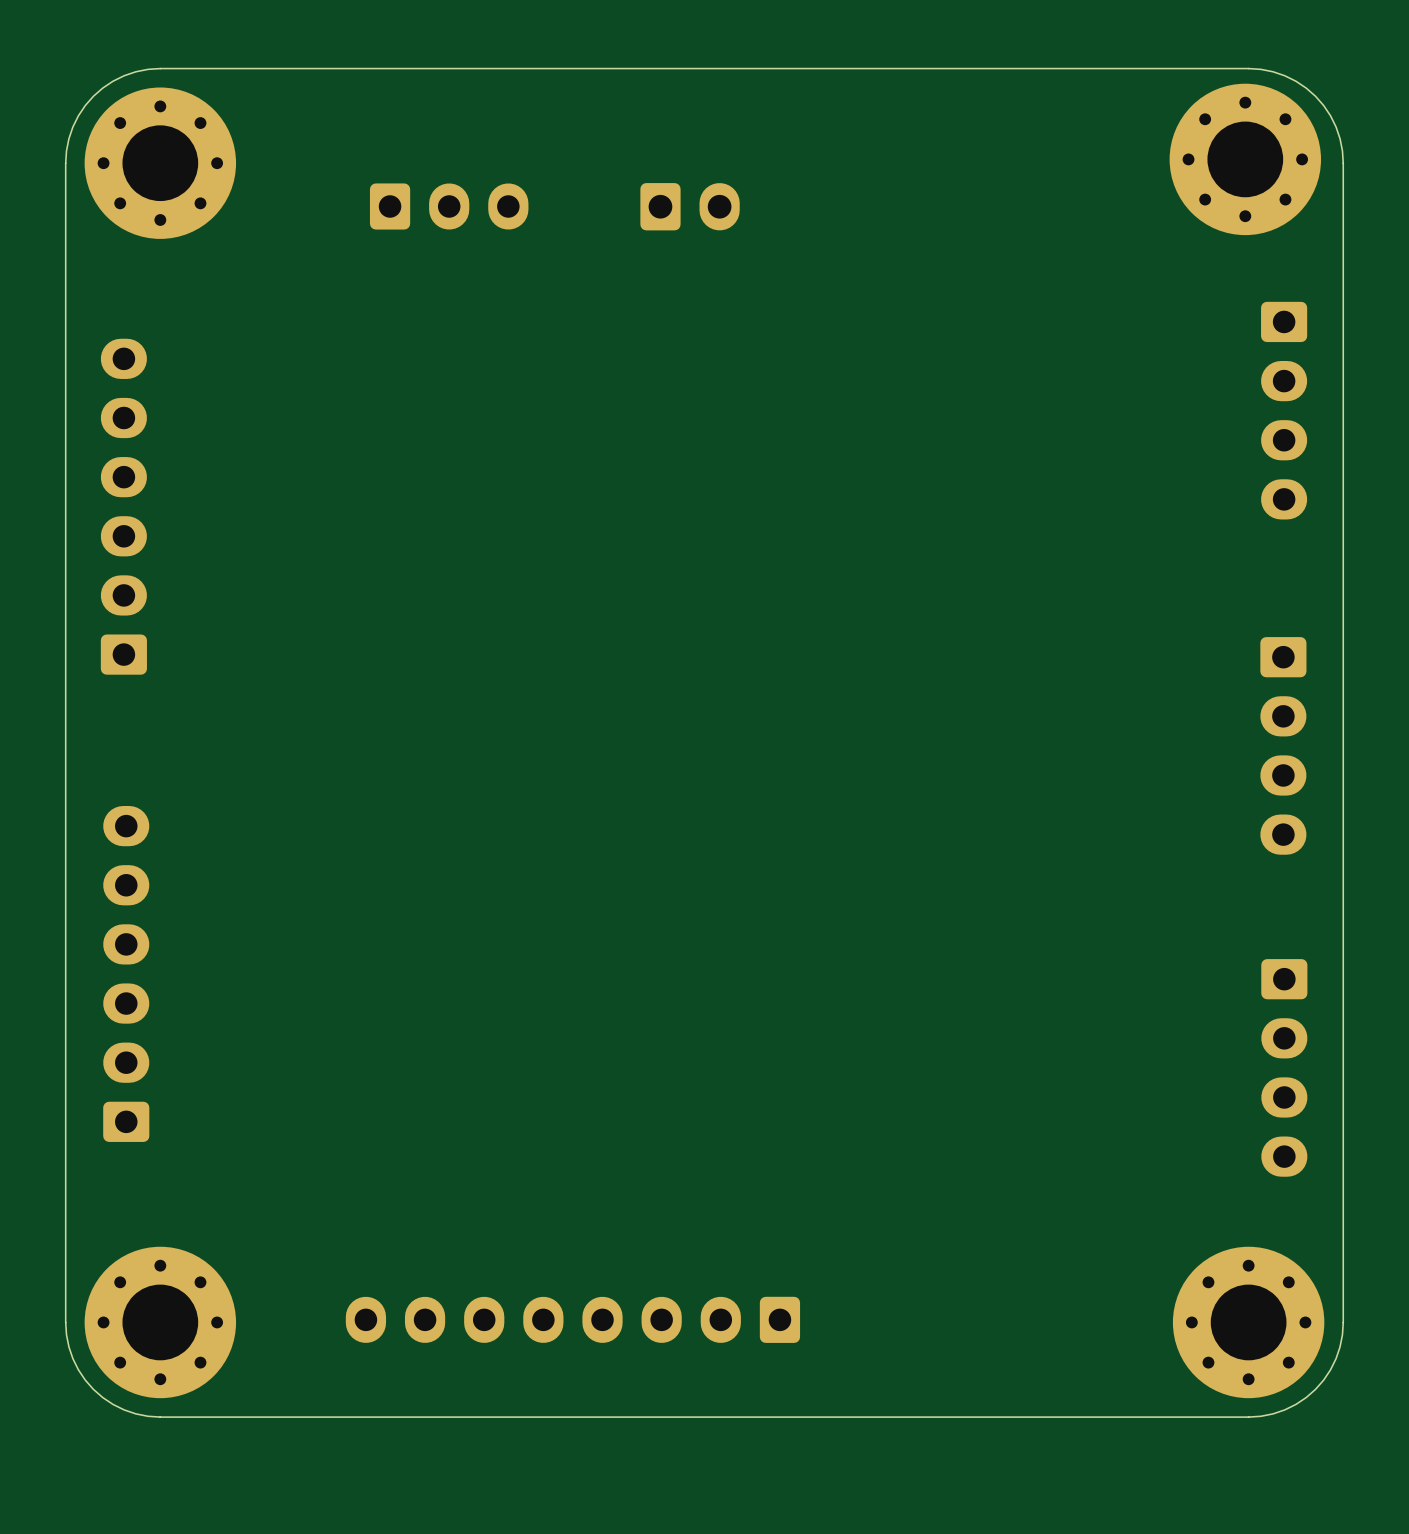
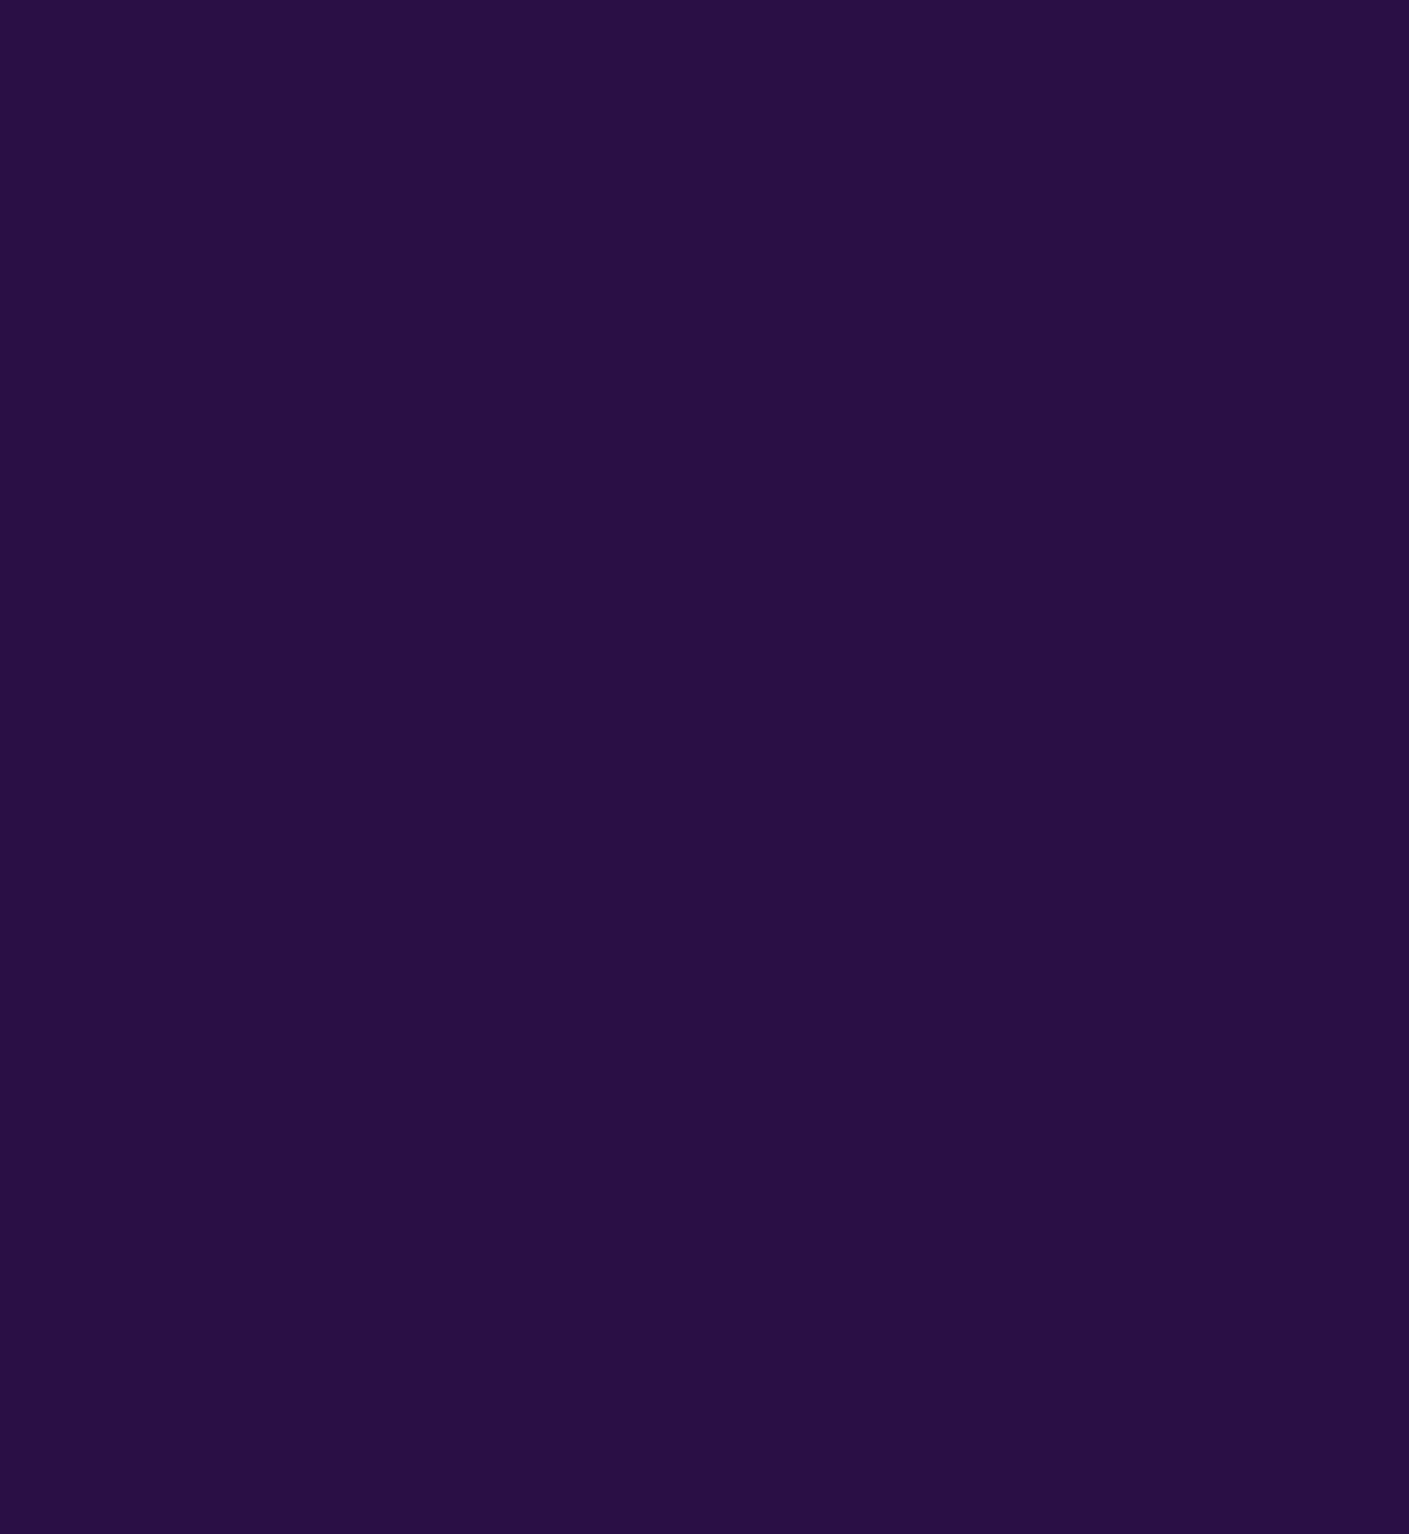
board edge: (1248, 68) (160, 68) (135, 71) (113, 81) (93, 96) (85, 105) (78, 115) (68, 138) (65, 163) (65, 1322) (66, 1334) (72, 1358) (85, 1380) (102, 1397) (113, 1404) (135, 1413) (160, 1417) (1248, 1417) (1273, 1413) (1295, 1404) (1315, 1389) (1323, 1380) (1336, 1358) (1340, 1346) (1343, 1322) (1343, 163) (1342, 150) (1336, 126) (1323, 105) (1315, 96) (1295, 81) (1284, 75) (1273, 71) (1248, 68) -> none
part: (1245, 159) -> none
part: (160, 163) -> none
part: (449, 206) -> none
part: (690, 206) -> none
part: (1284, 410) -> none
part: (123, 506) -> none
part: (1283, 745) -> none
part: (126, 973) -> none
part: (1284, 1067) -> none
part: (572, 1319) -> none
part: (160, 1322) -> none
part: (1248, 1322) -> none

